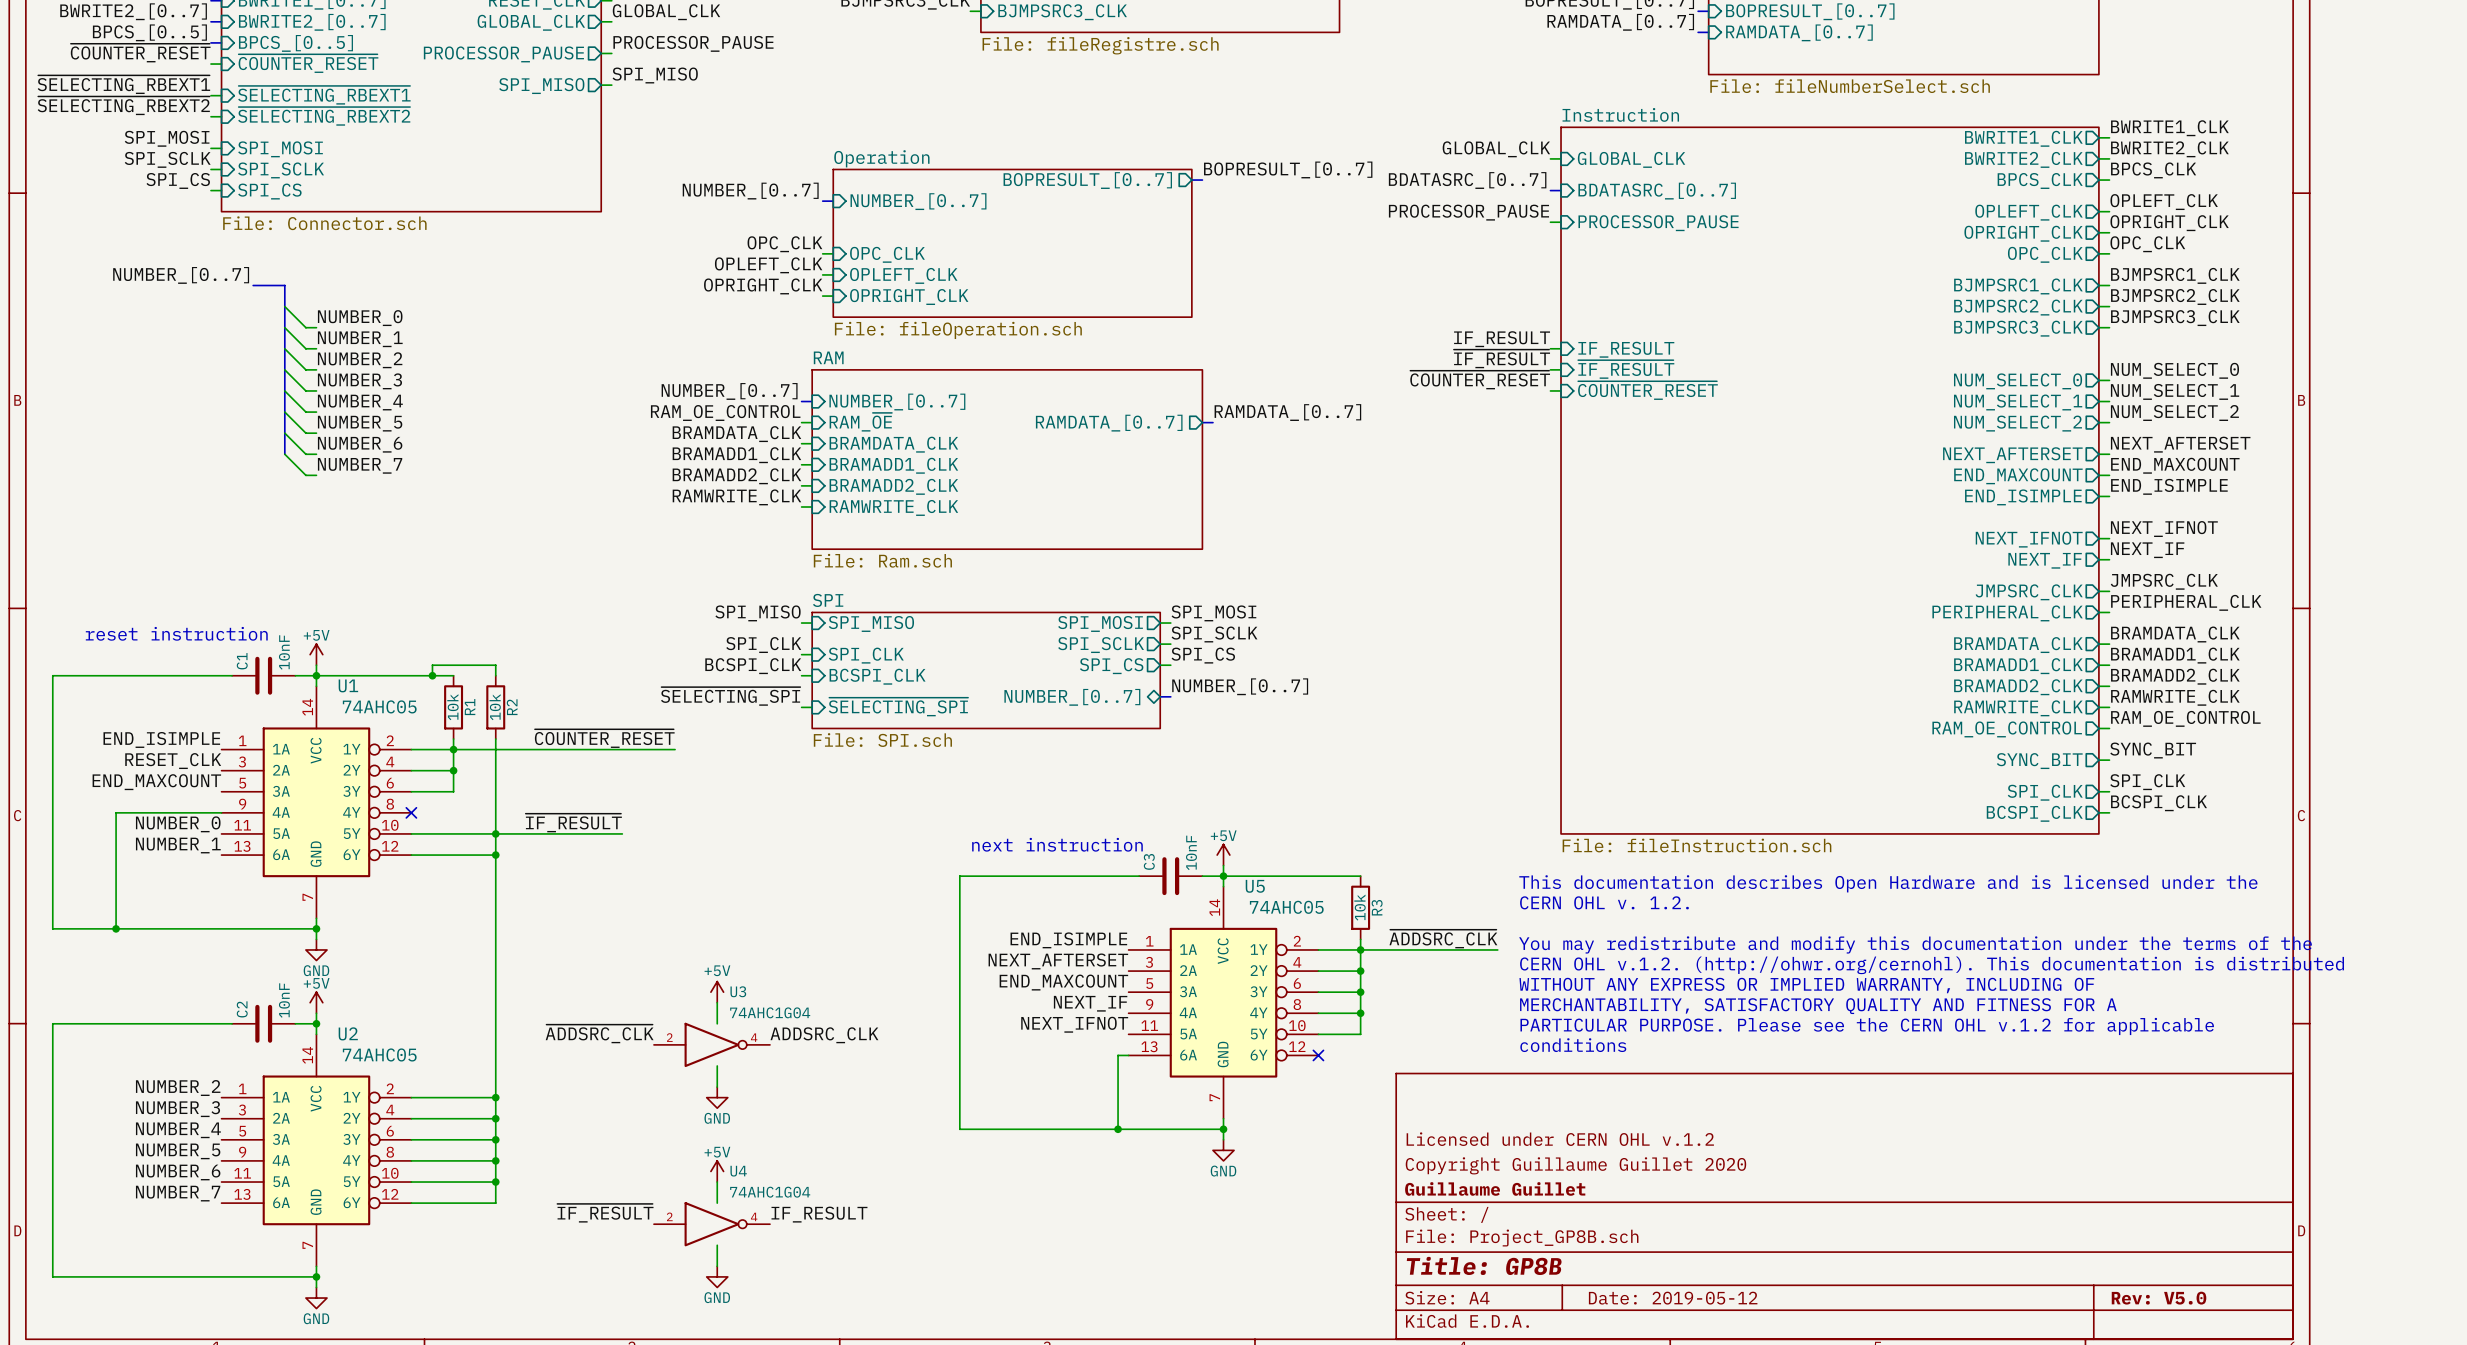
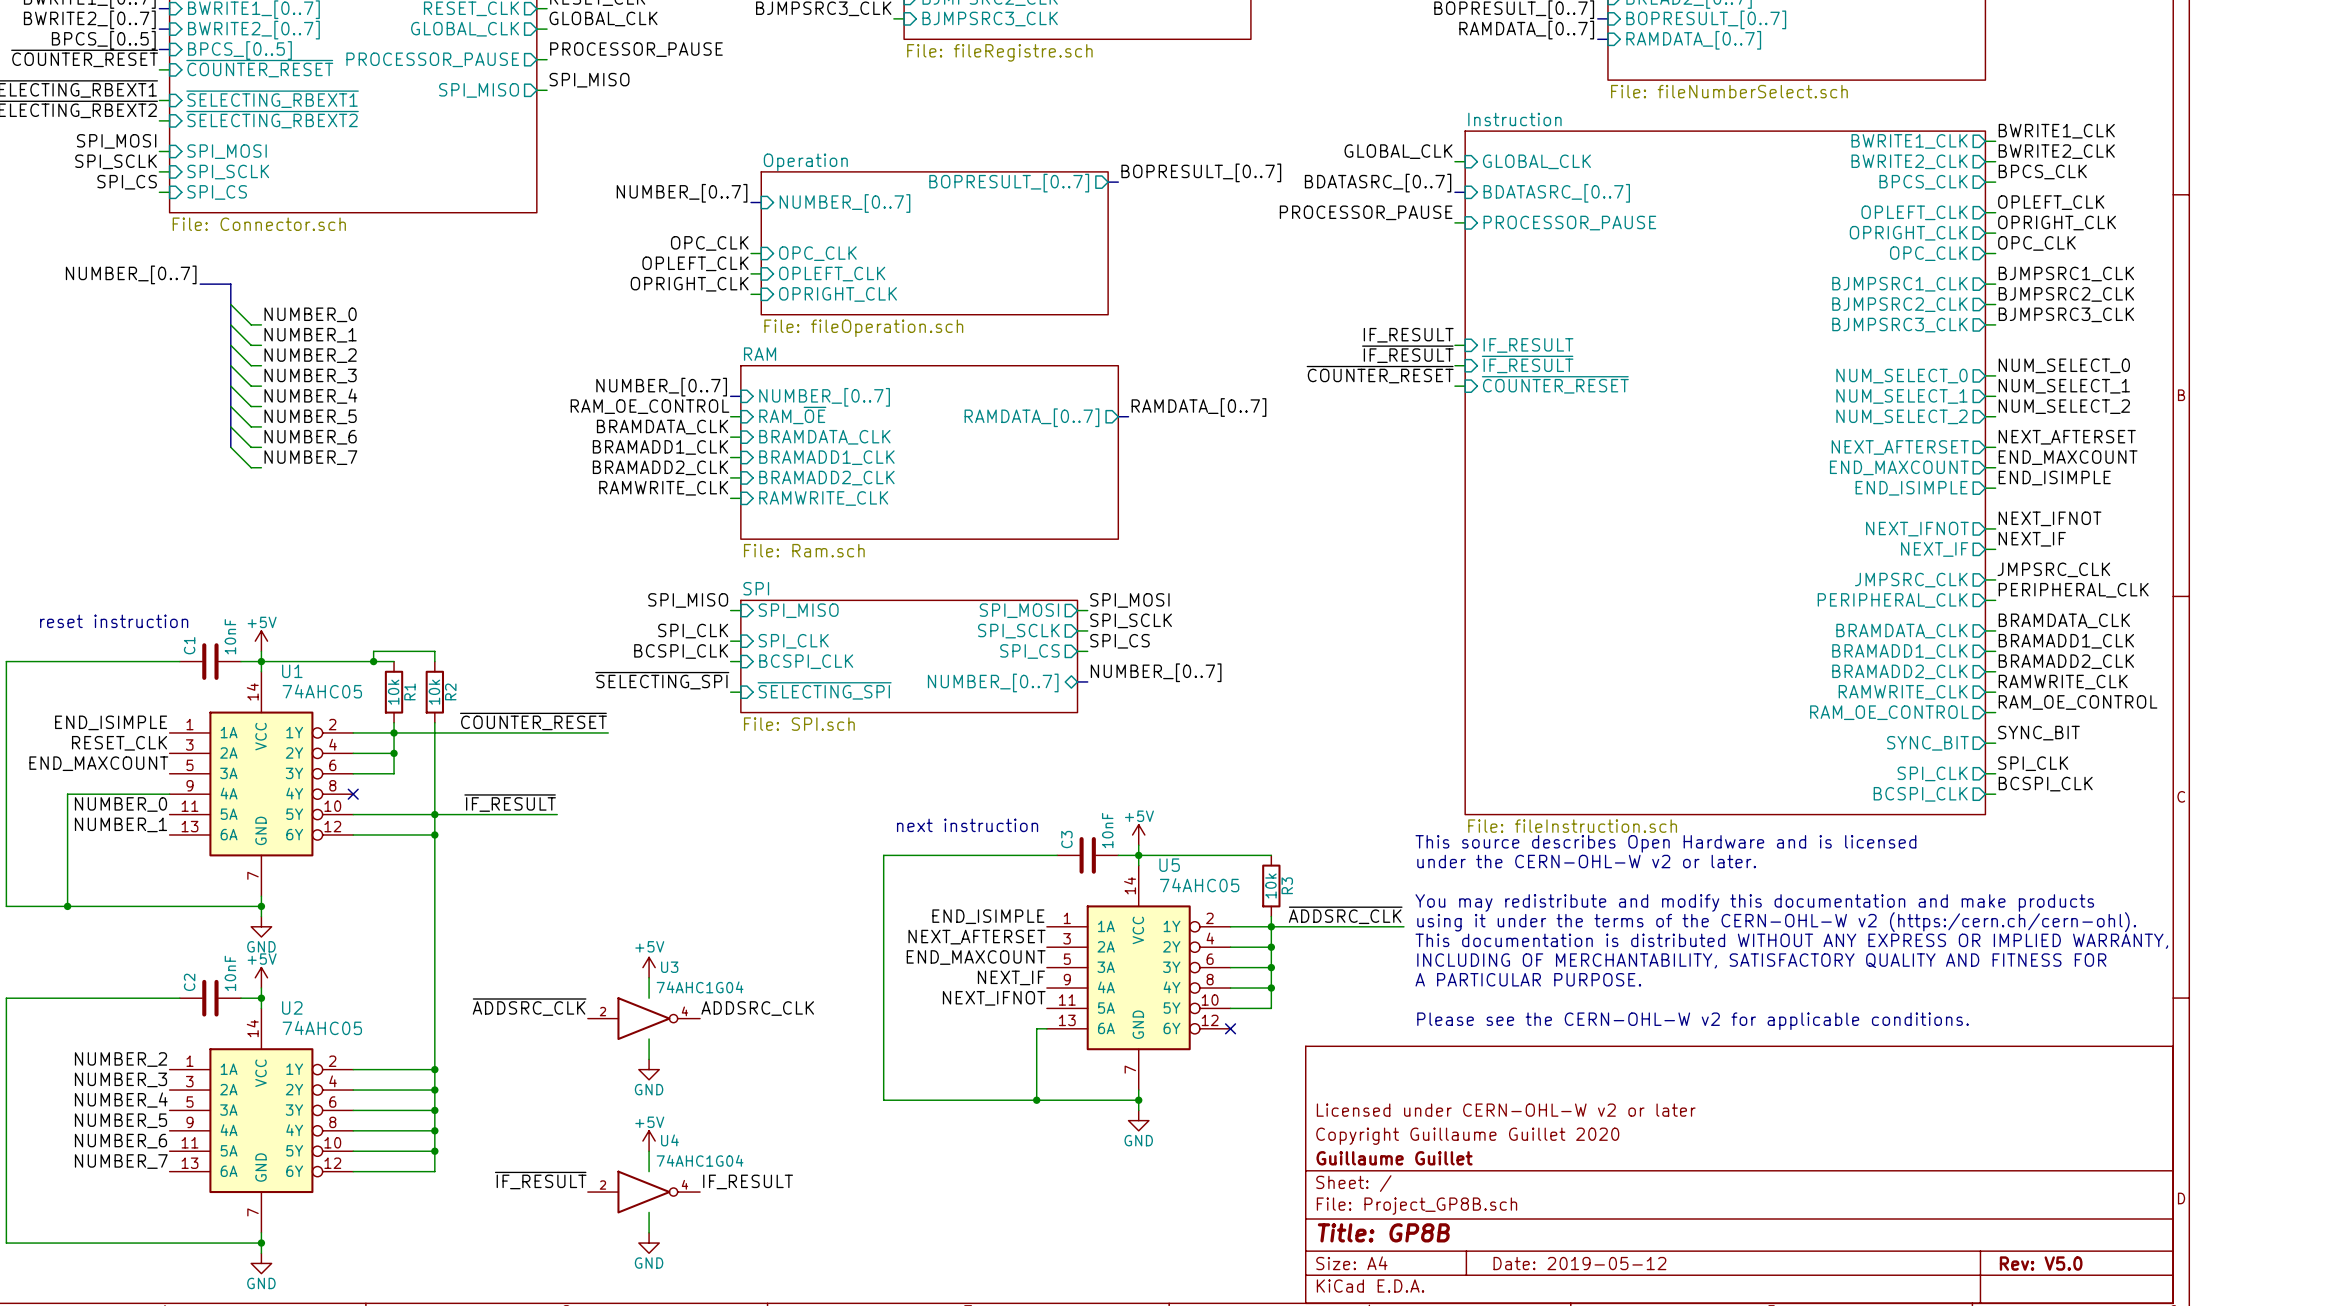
text: none -> under the CERN-OHL-W v2 or later. (1586, 861)
text: This documentation describes Open Hardware and is licensed under the (1888, 883) -> This source describes Open Hardware and is licensed (1665, 843)
text: CERN OHL v. 1.2. (1604, 902) -> none
text: none -> using it under the terms of the CERN-OHL-W v2 (https:/cern.ch/cern-ohl). (1776, 922)
text: You may redistribute and modify this documentation under the terms of the (1915, 944) -> You may redistribute and modify this documentation and make products (1754, 902)
text: CERN OHL v.1.2. (http://ohwr.org/cernohl). This documentation is distributed (1932, 965) -> none
text: WITHOUT ANY EXPRESS OR IMPLIED WARRANTY, INCLUDING OF (1806, 985) -> This documentation is distributed WITHOUT ANY EXPRESS OR IMPLIED WARRANTY, (1791, 941)
text: none -> A PARTICULAR PURPOSE. (1528, 979)
text: MERCHANTABILITY, SATISFACTORY QUALITY AND FITNESS FOR A (1818, 1006) -> INCLUDING OF MERCHANTABILITY, SATISFACTORY QUALITY AND FITNESS FOR (1761, 960)
text: PARTICULAR PURPOSE. Please see the CERN OHL v.1.2 for applicable (1867, 1026) -> Please see the CERN-OHL-W v2 for applicable conditions. (1693, 1021)
text: conditions (1573, 1045) -> none
title block: Licensed under CERN OHL v.1.2 (1560, 1139) -> Licensed under CERN-OHL-W v2 or later (1506, 1110)

